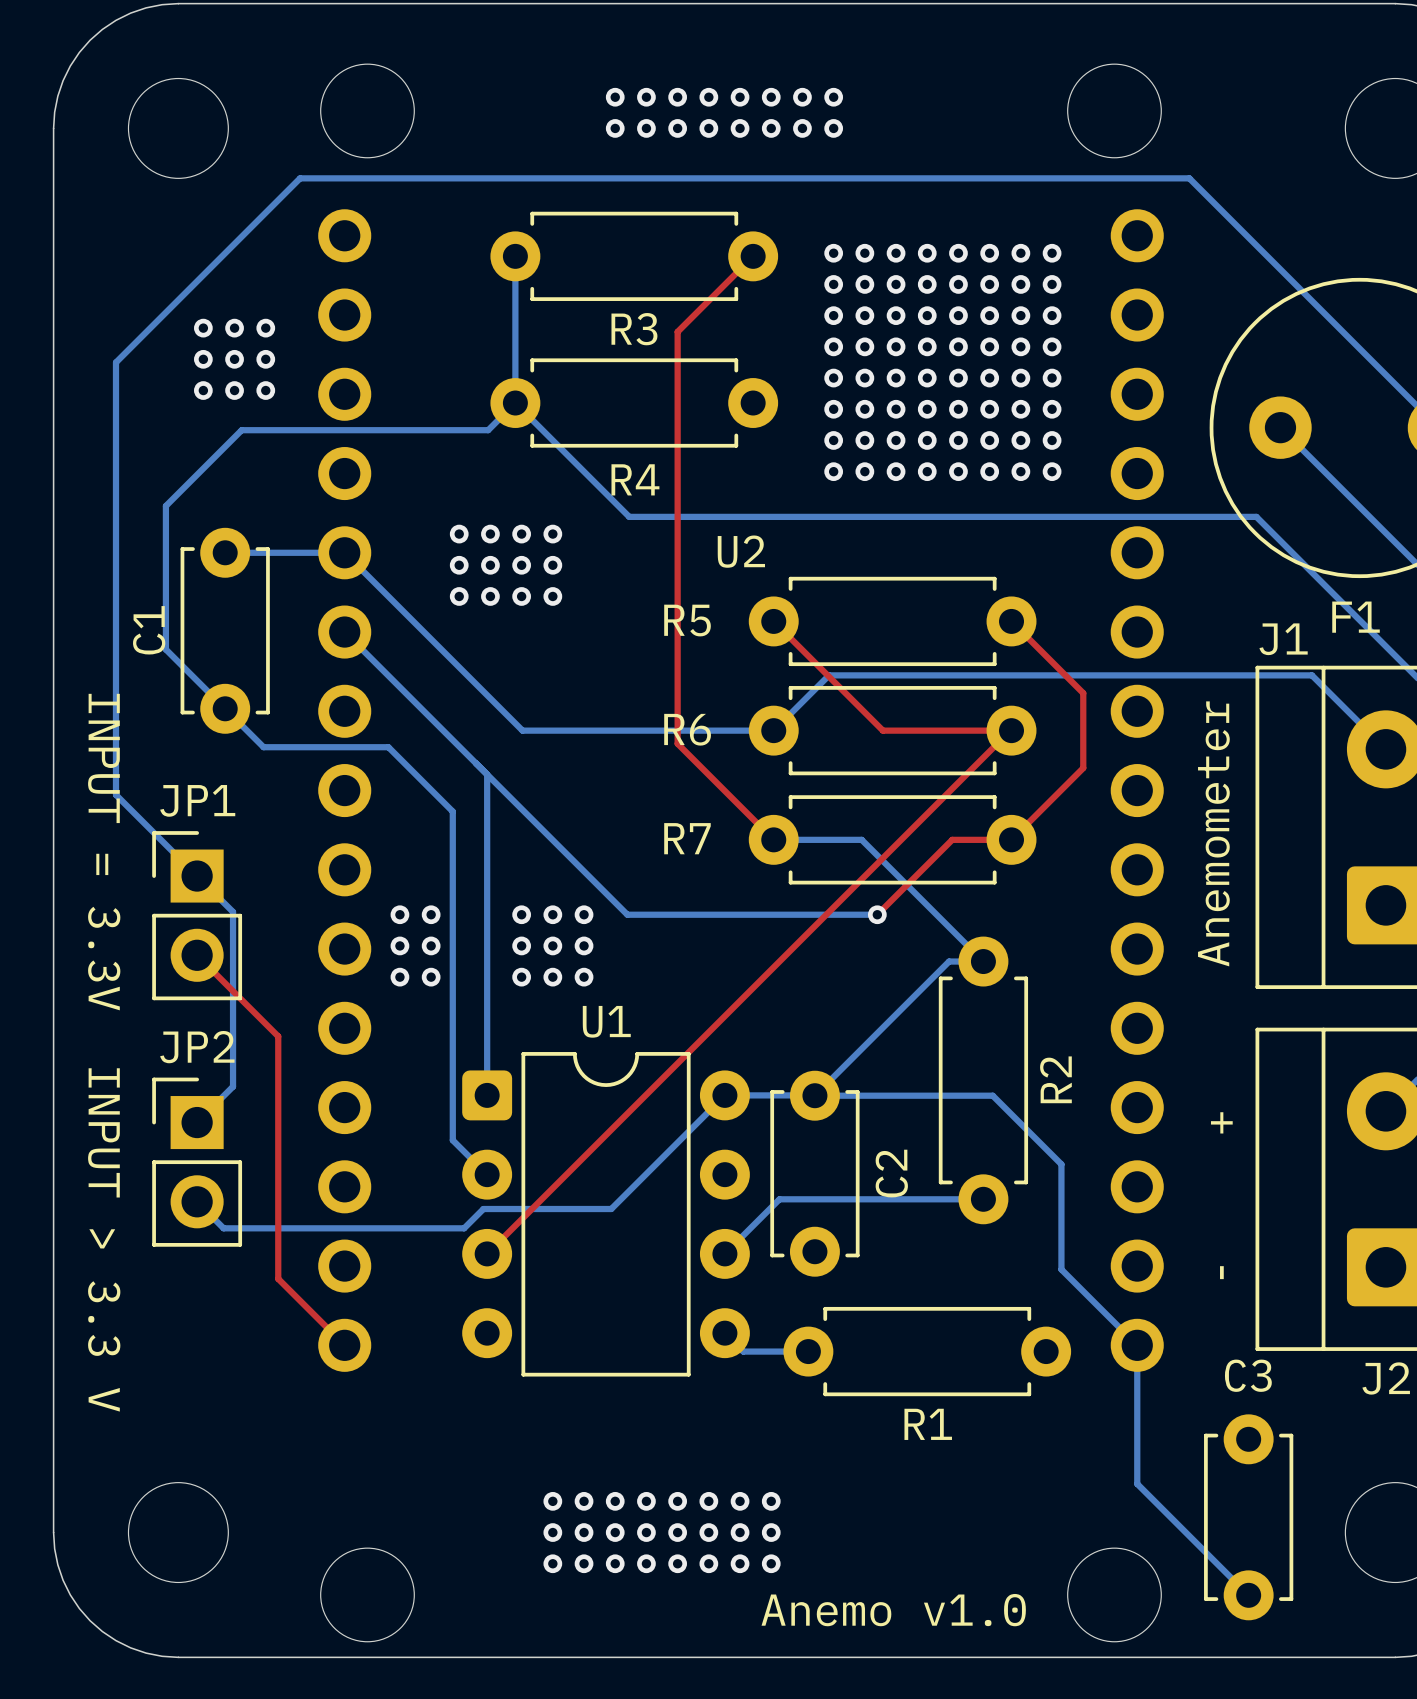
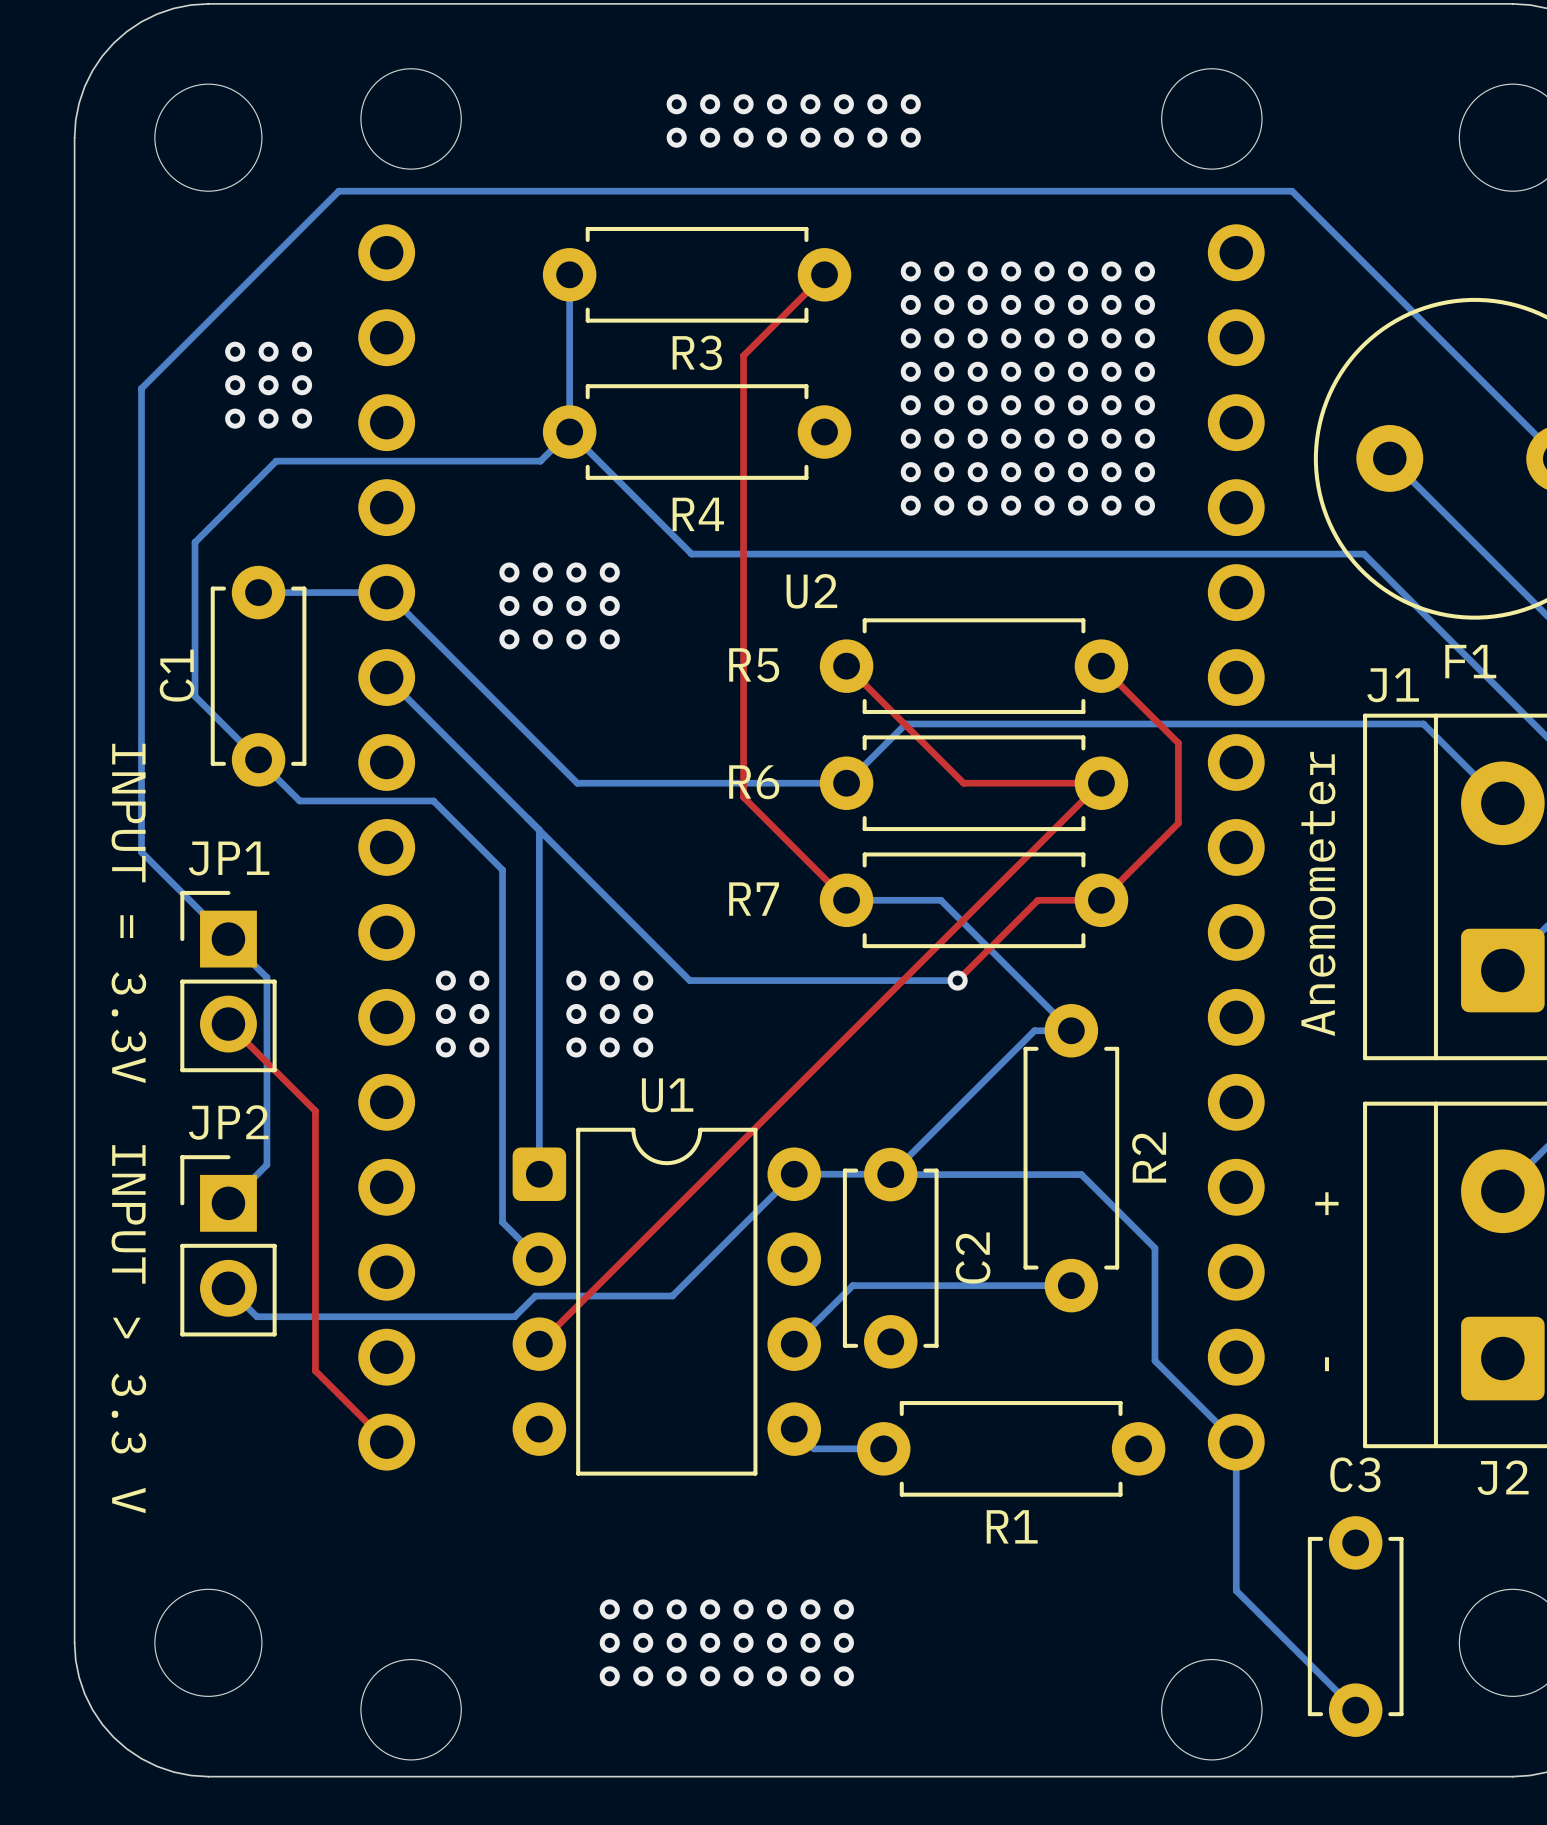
text: Anemo v1.0 (893, 1610) -> none

